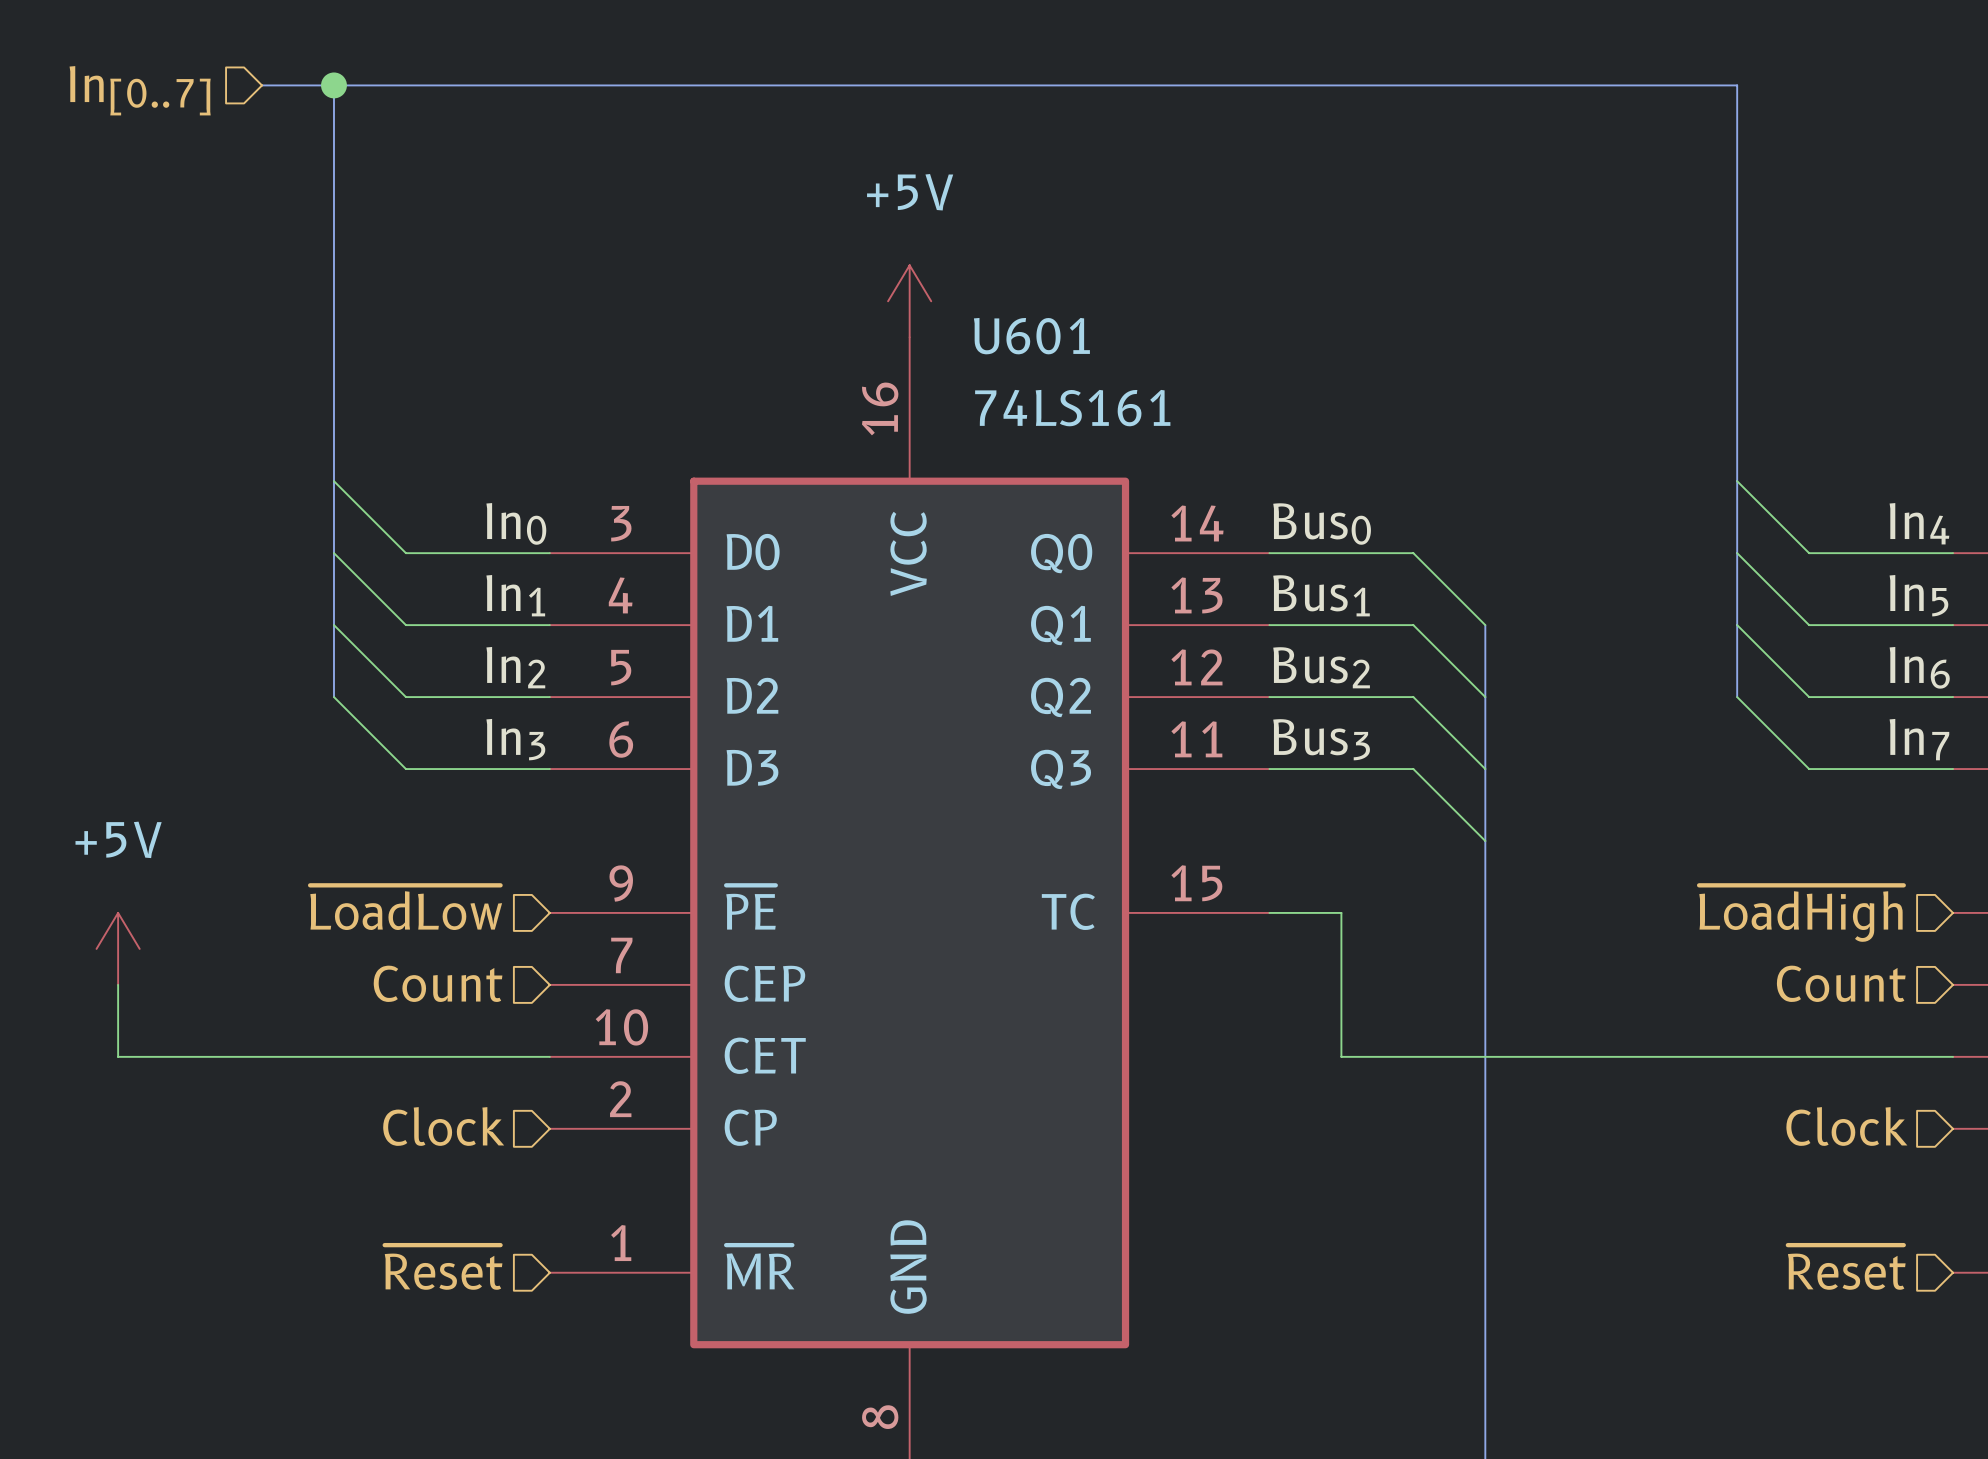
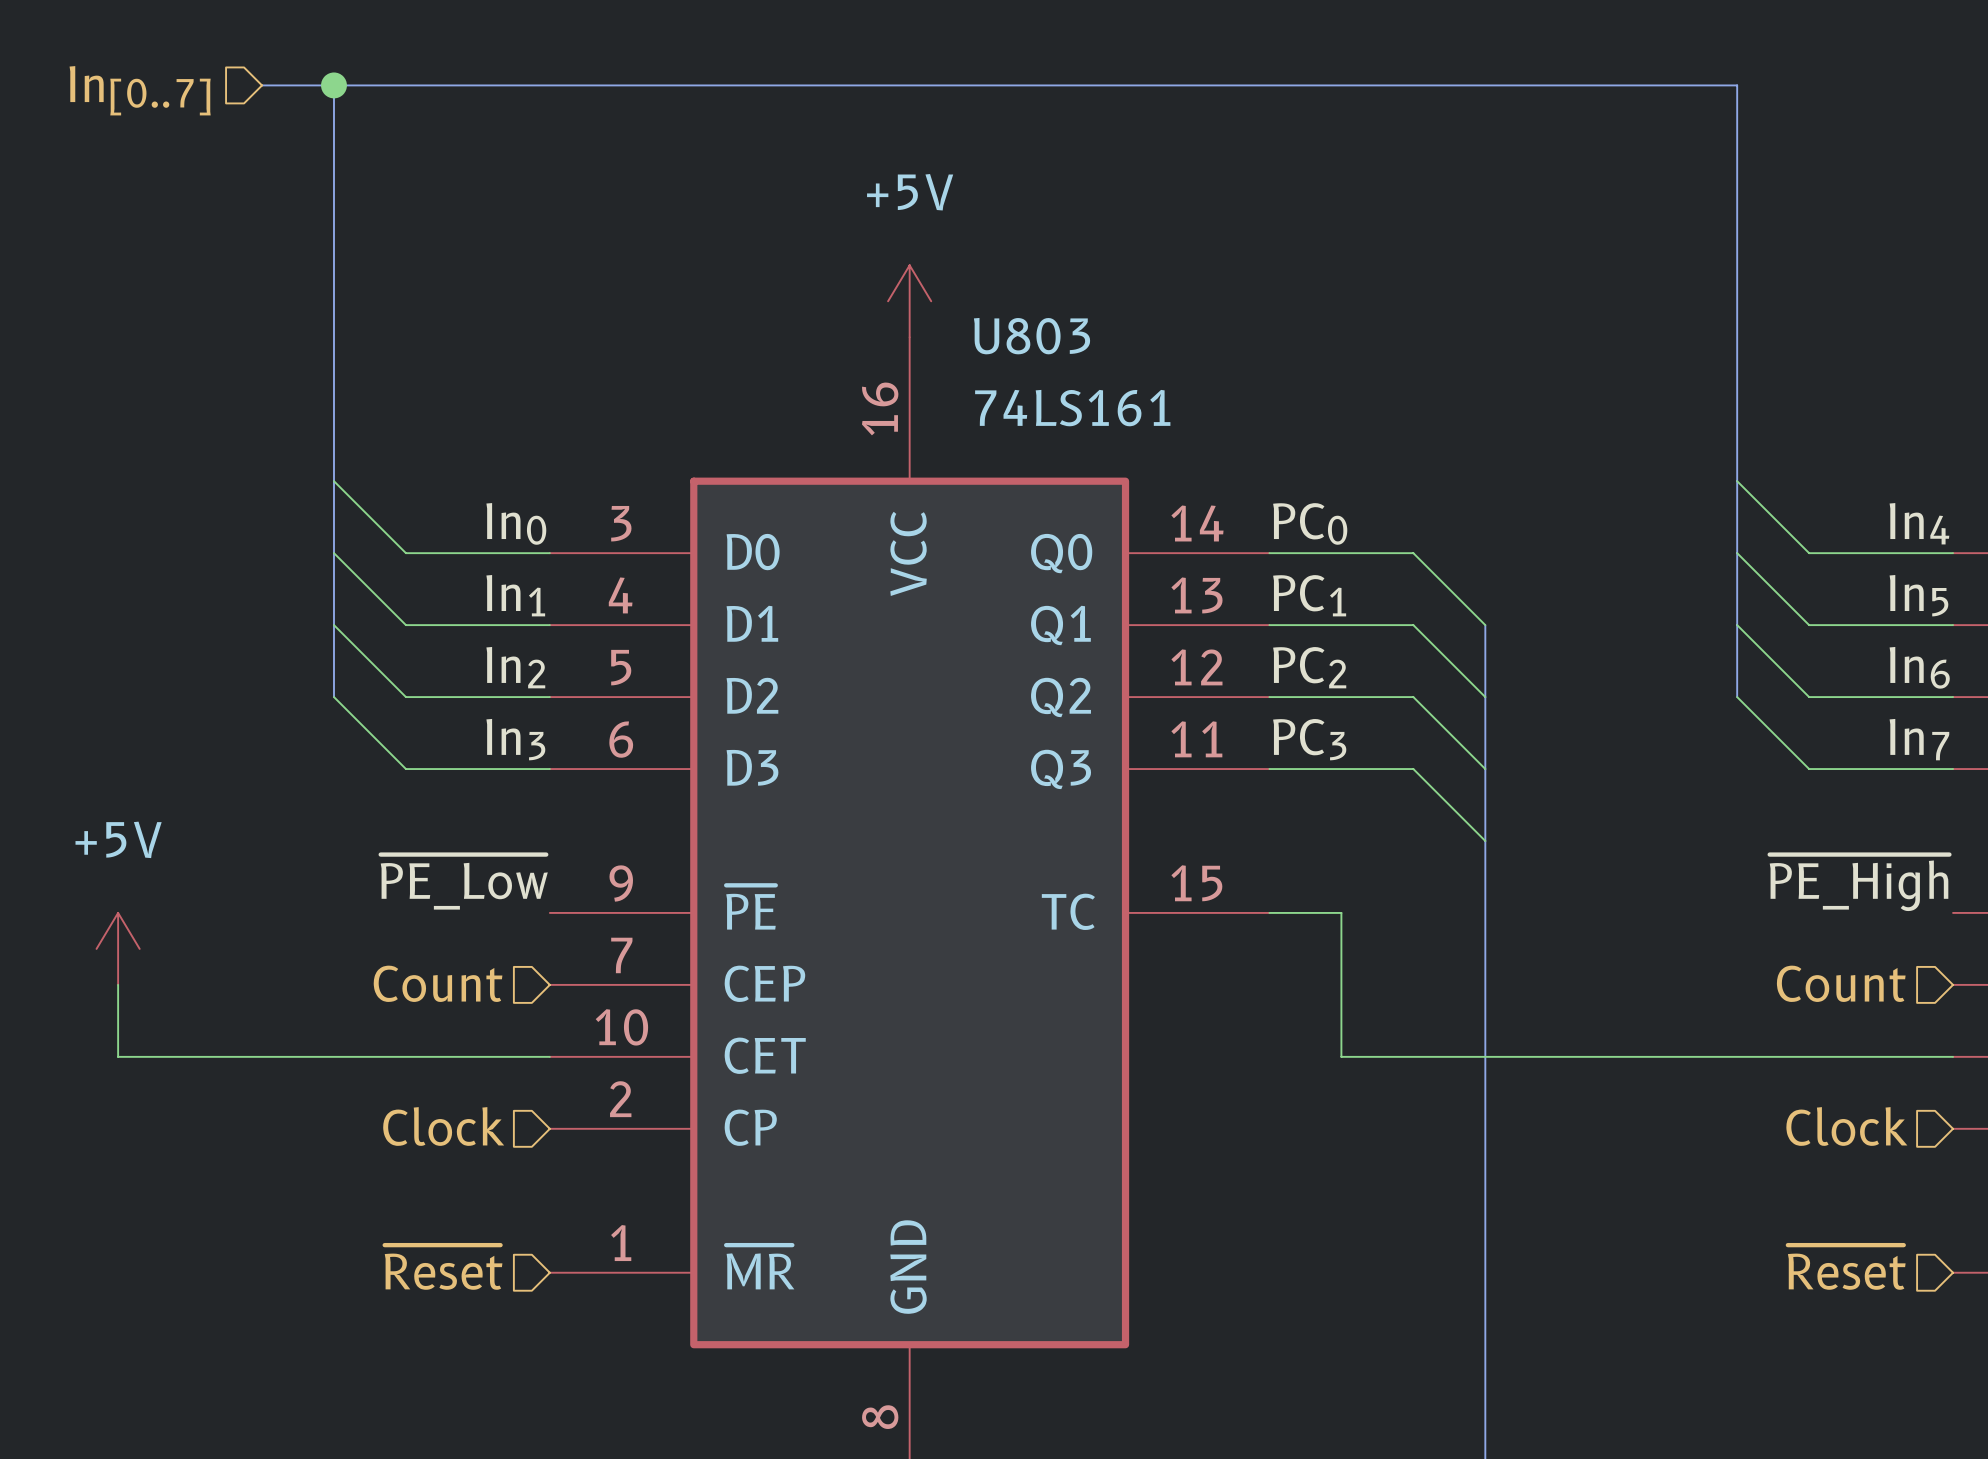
U601 name: U601 (1031, 336) -> U803 (1032, 336)
label: Bus0 (1322, 524) -> PC0 (1310, 523)
label: Bus1 (1321, 595) -> PC1 (1309, 595)
label: Bus2 (1321, 667) -> PC2 (1309, 667)
label: Bus3 (1321, 739) -> PC3 (1309, 739)
label: none -> ~{PE_Low} (464, 882)
label: none -> ~{PE_High} (1859, 882)
hierarchical label: ~{LoadLow} (406, 907) -> none
hierarchical label: ~{LoadHigh} (1801, 913) -> none

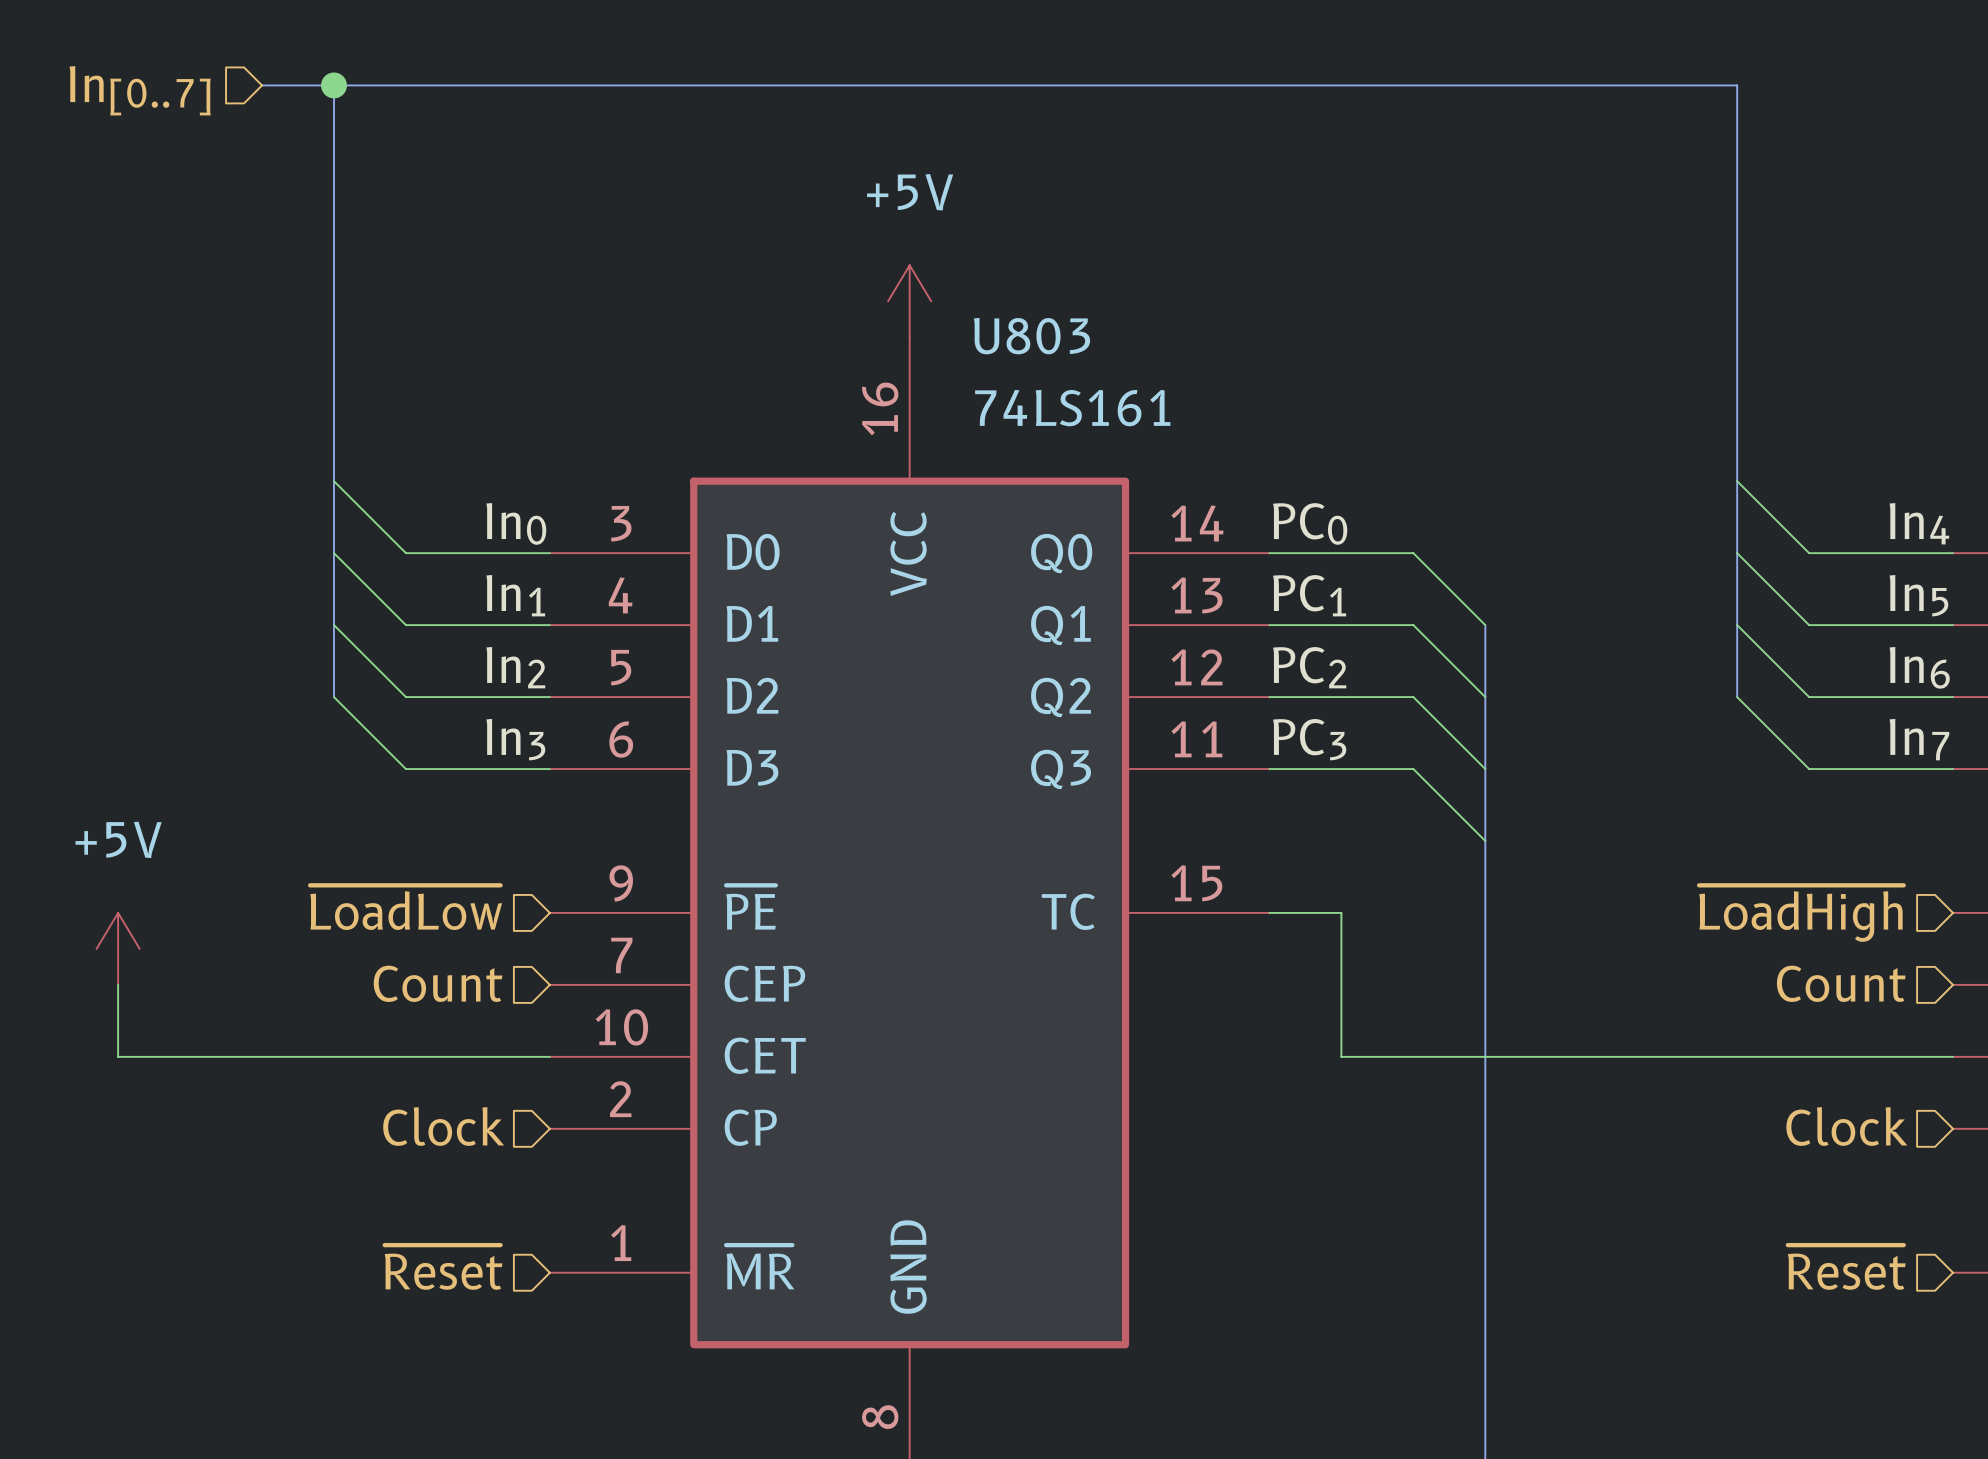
label: ~{PE_Low} (464, 882) -> none
label: ~{PE_High} (1859, 882) -> none
hierarchical label: none -> ~{LoadLow} (406, 907)
hierarchical label: none -> ~{LoadHigh} (1801, 913)

